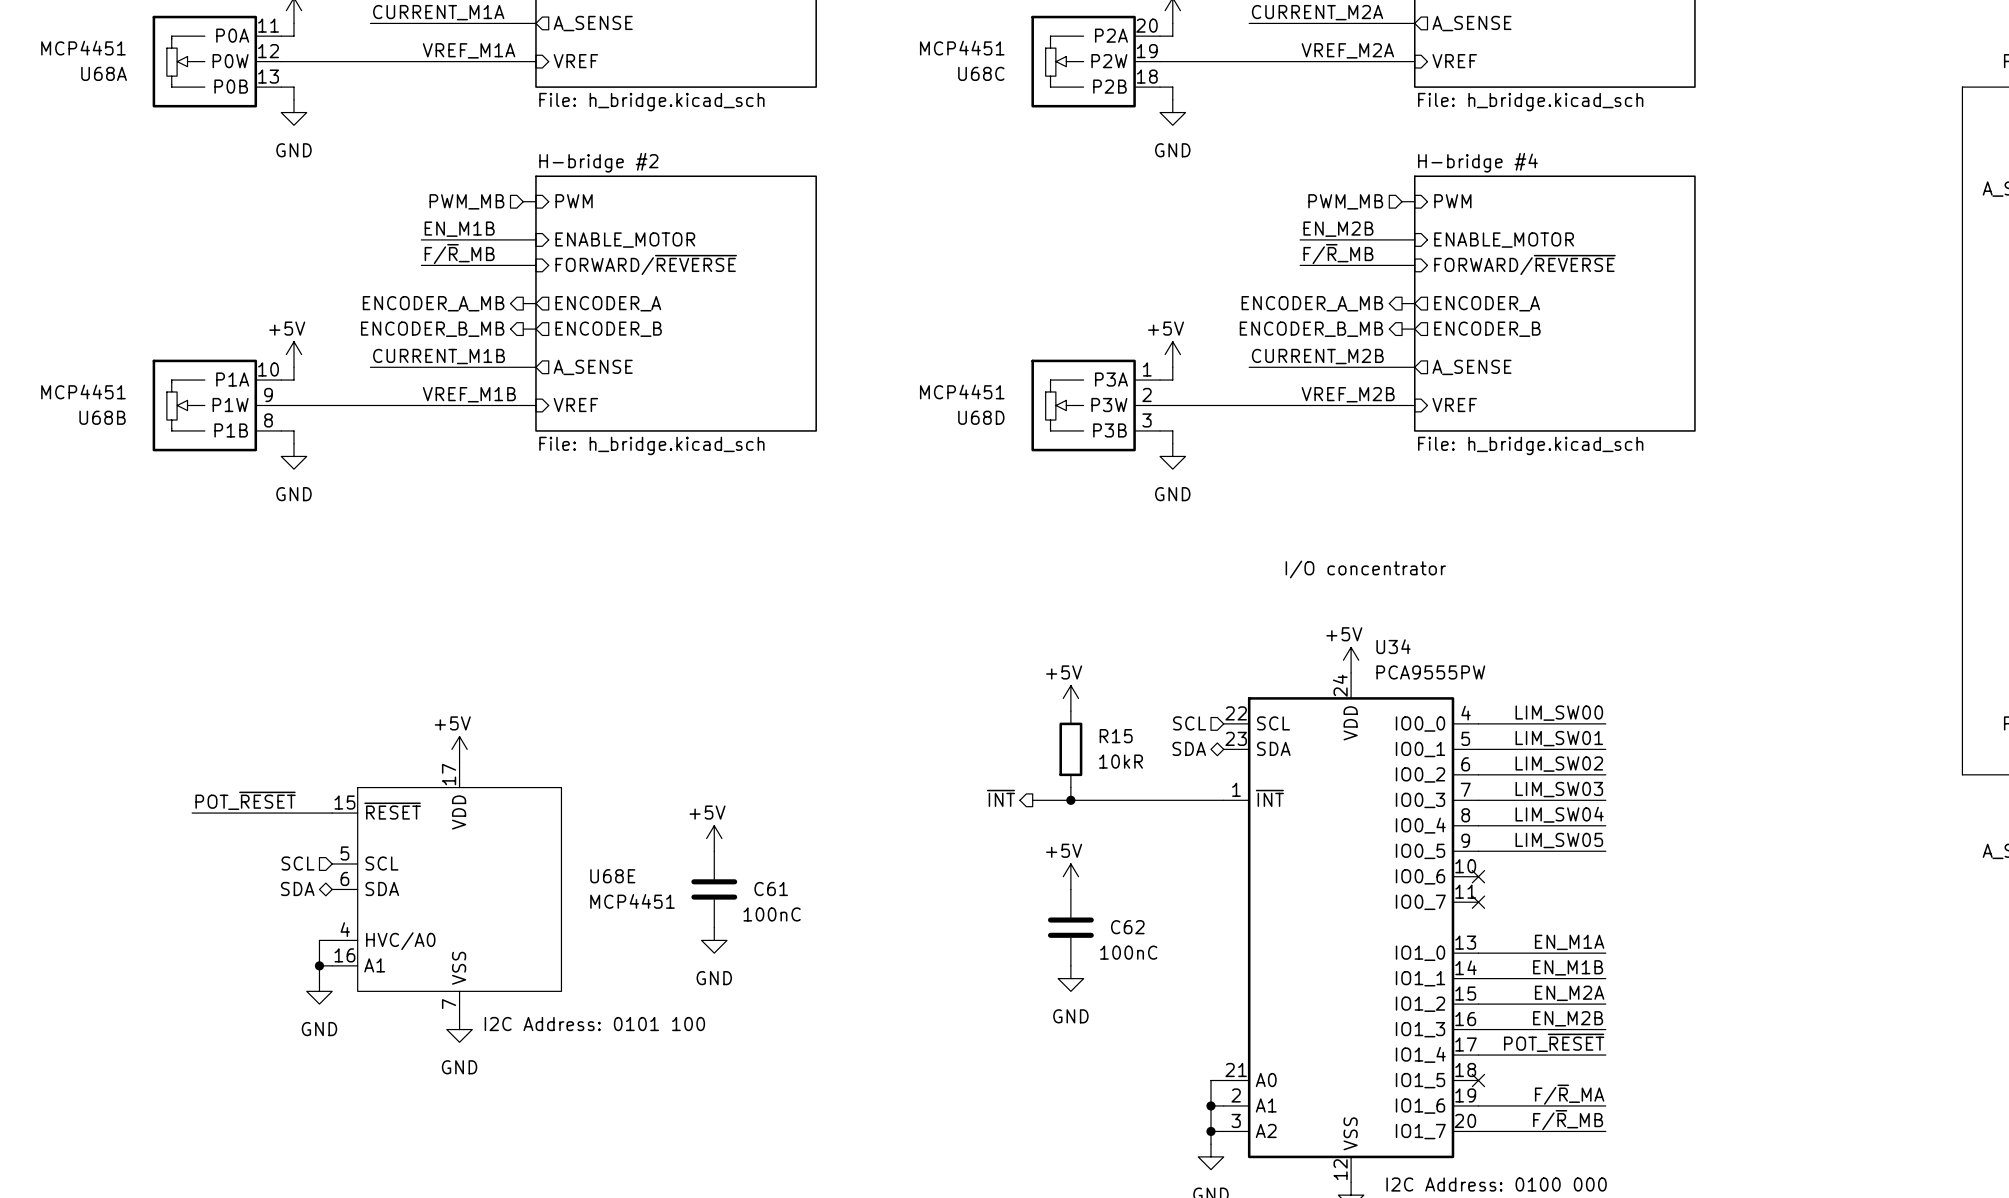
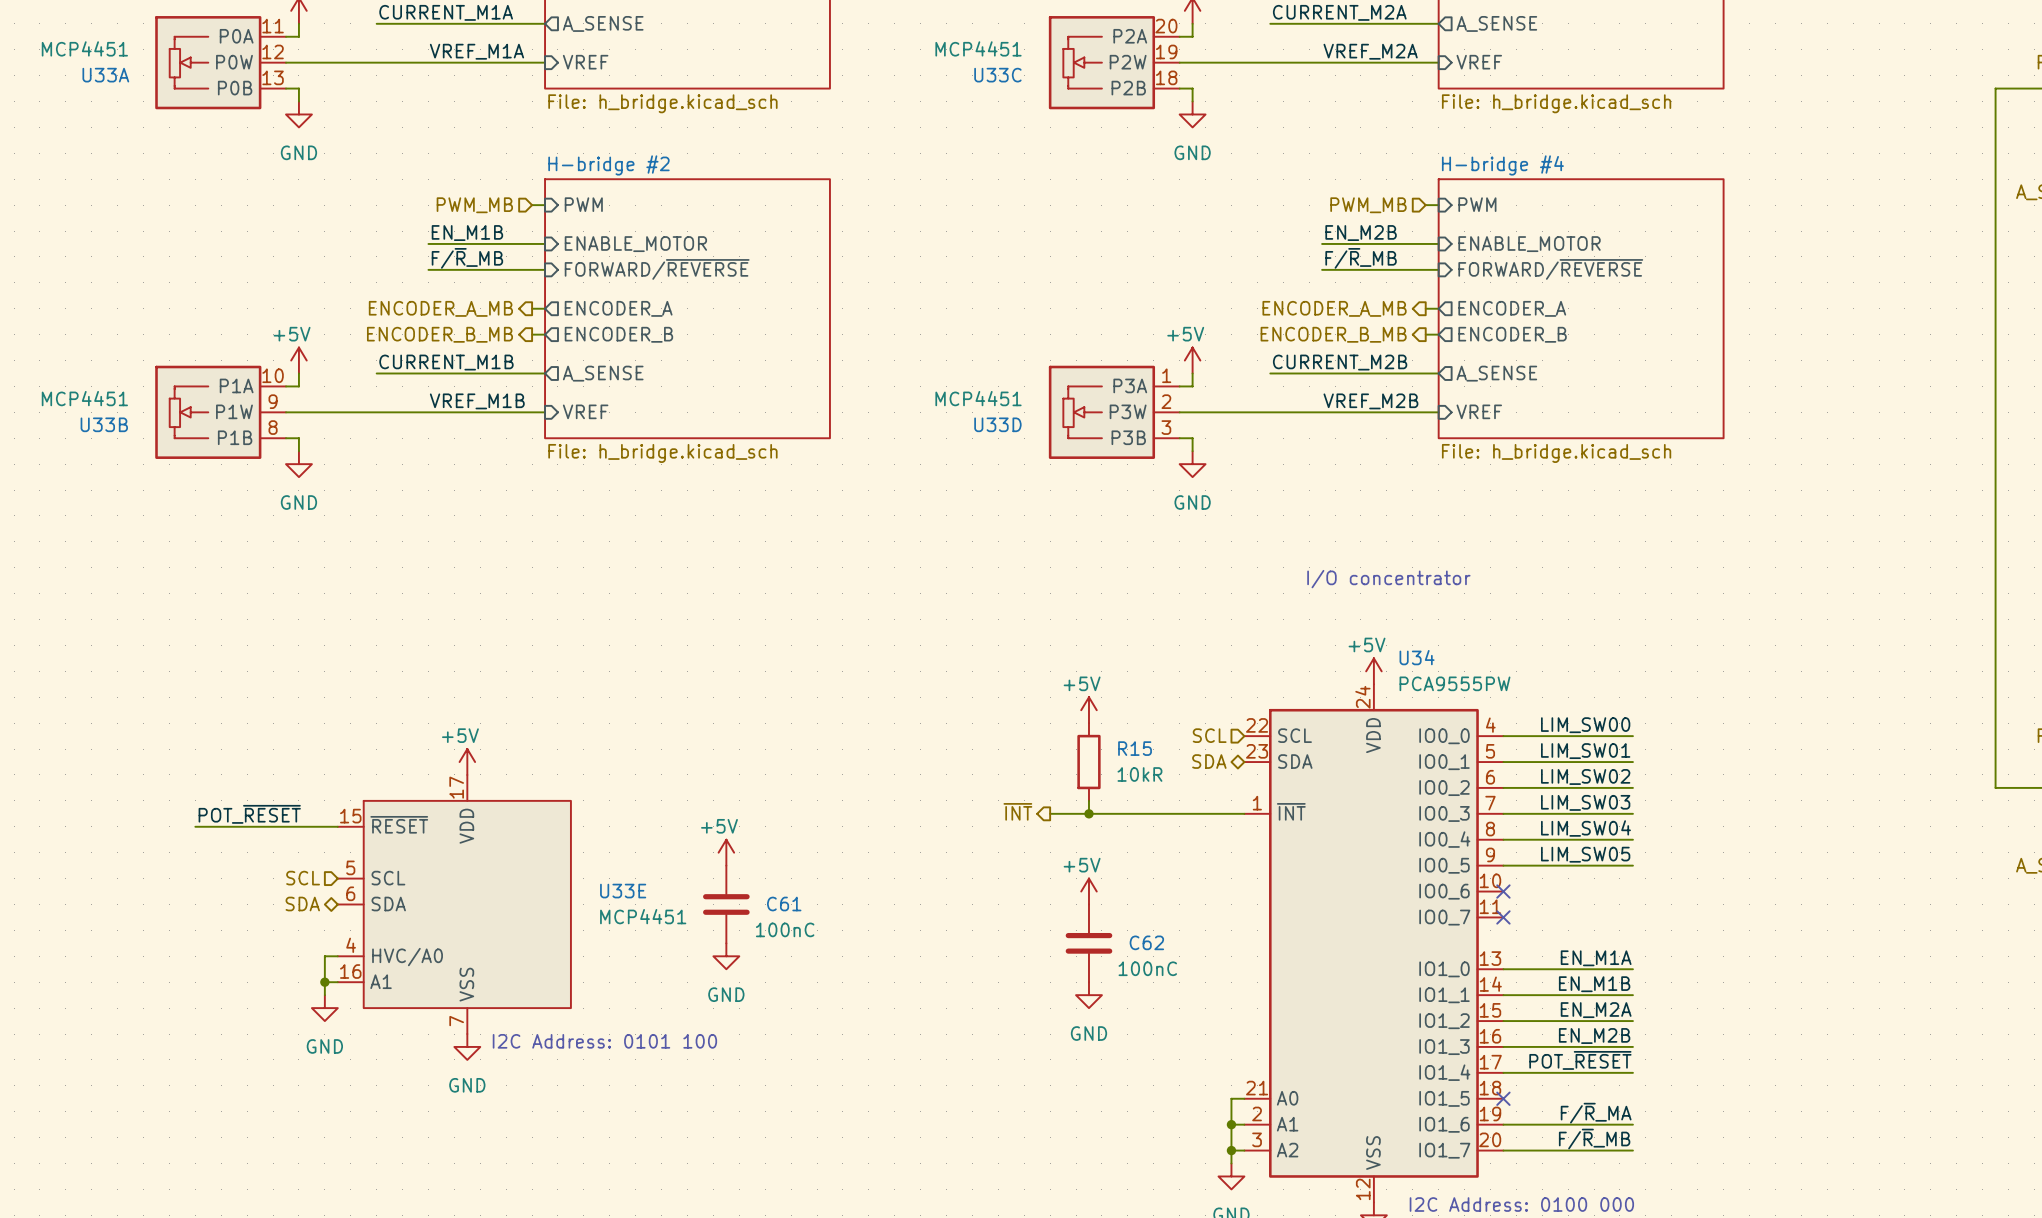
U68A name: U68A (104, 73) -> U33A (105, 75)
U68C name: U68C (981, 73) -> U33C (997, 75)
U68B name: U68B (102, 417) -> U33B (104, 424)
U68D name: U68D (981, 417) -> U33D (997, 424)
U68E name: U68E (612, 876) -> U33E (623, 891)

